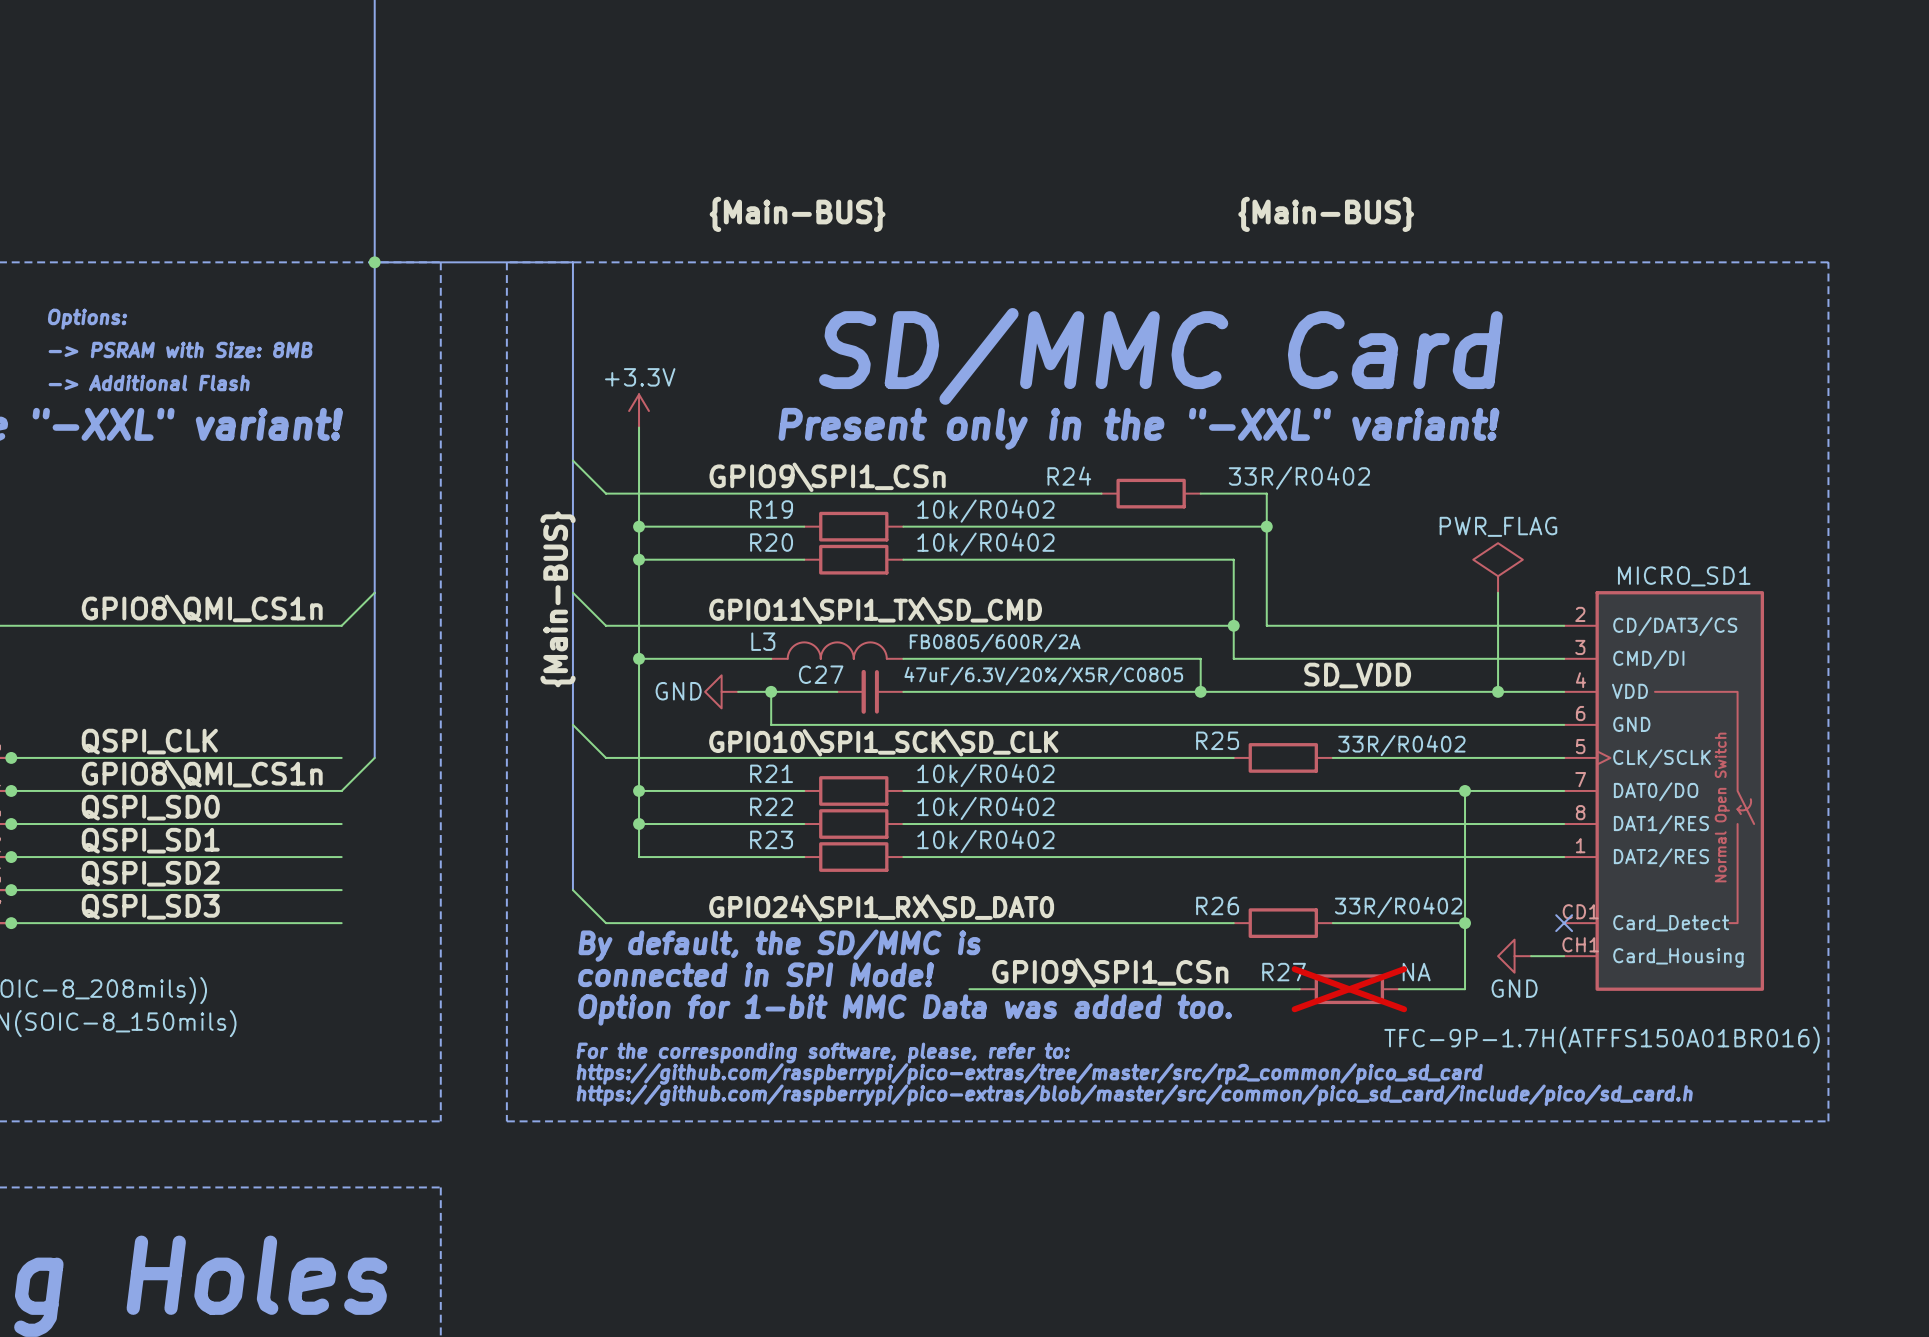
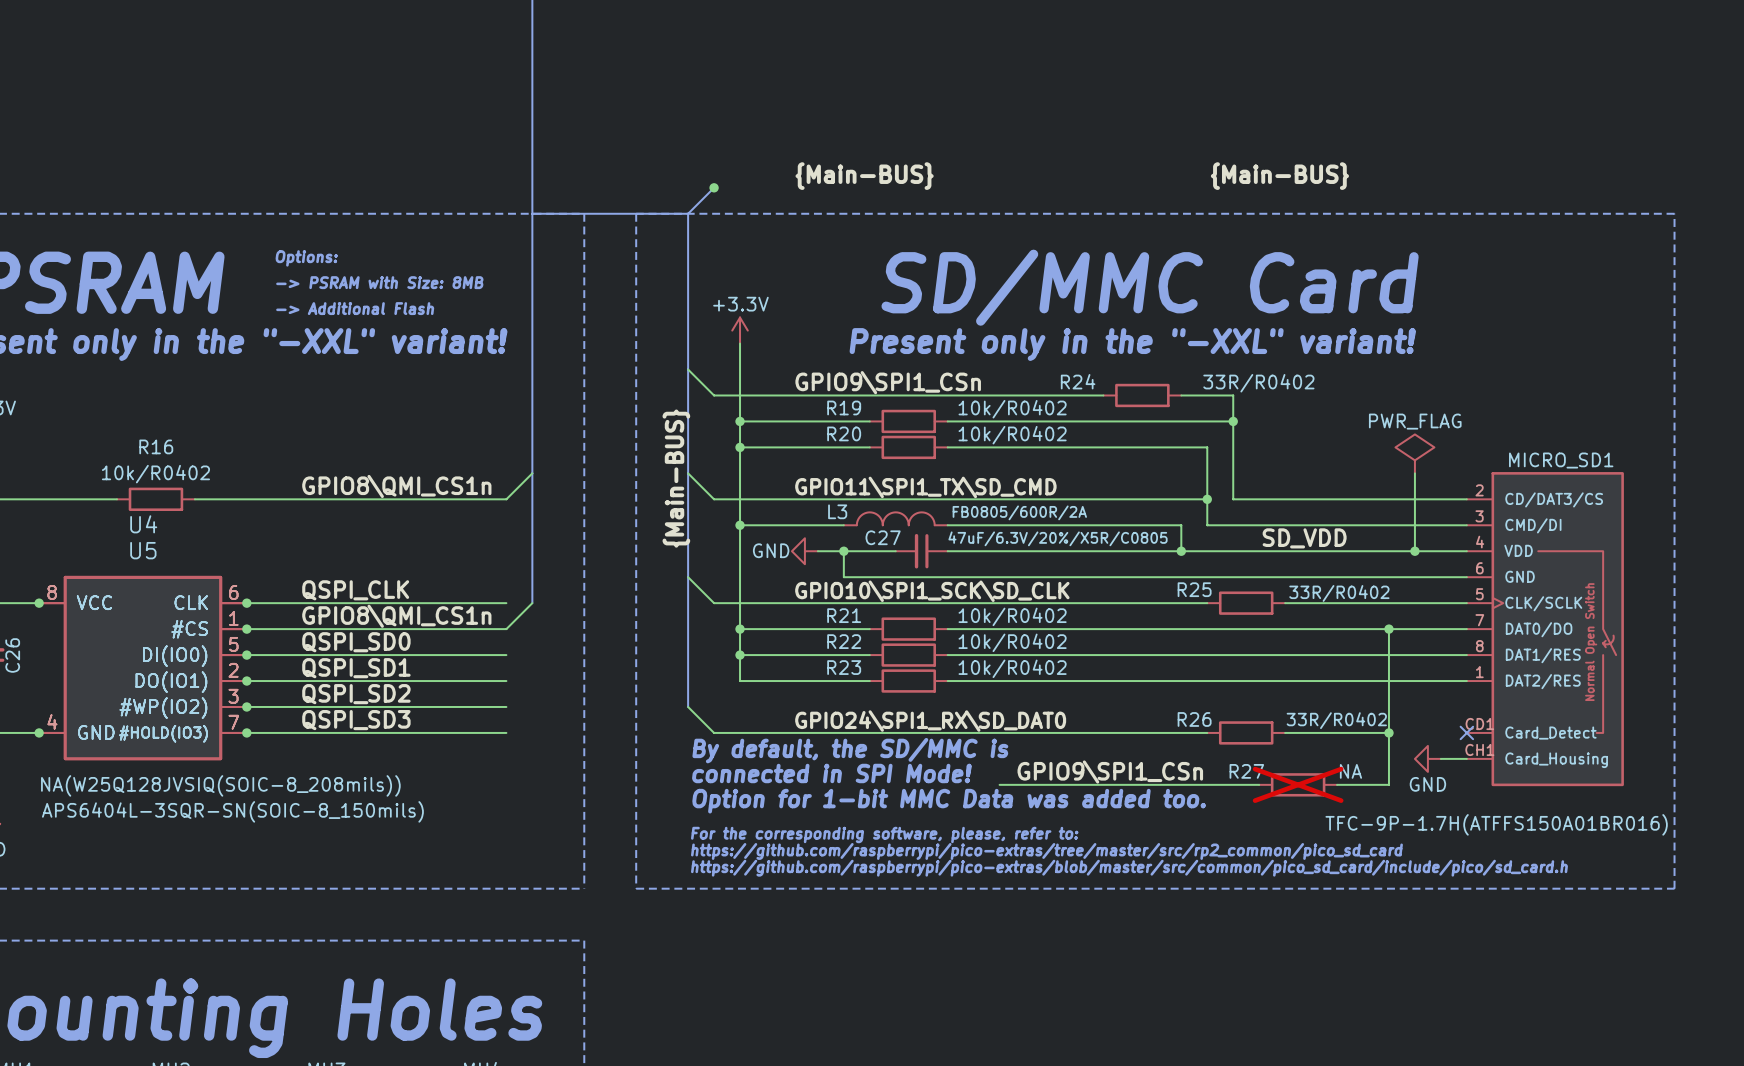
bus: none -> (714, 187) (688, 213)
junction: none -> (714, 187)
junction: (374, 262) -> none

